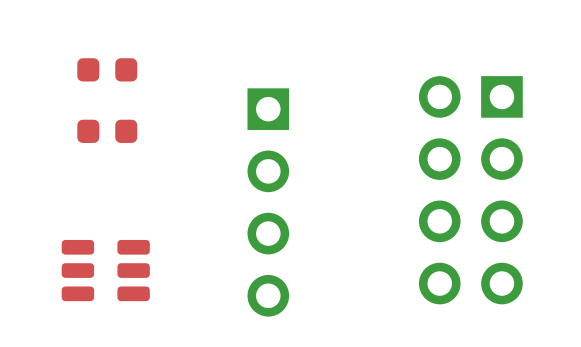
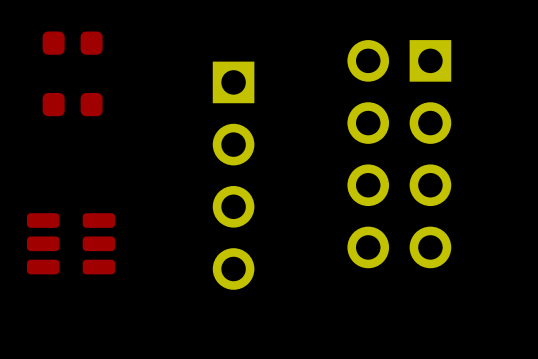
part position: (470, 190) -> (399, 154)

